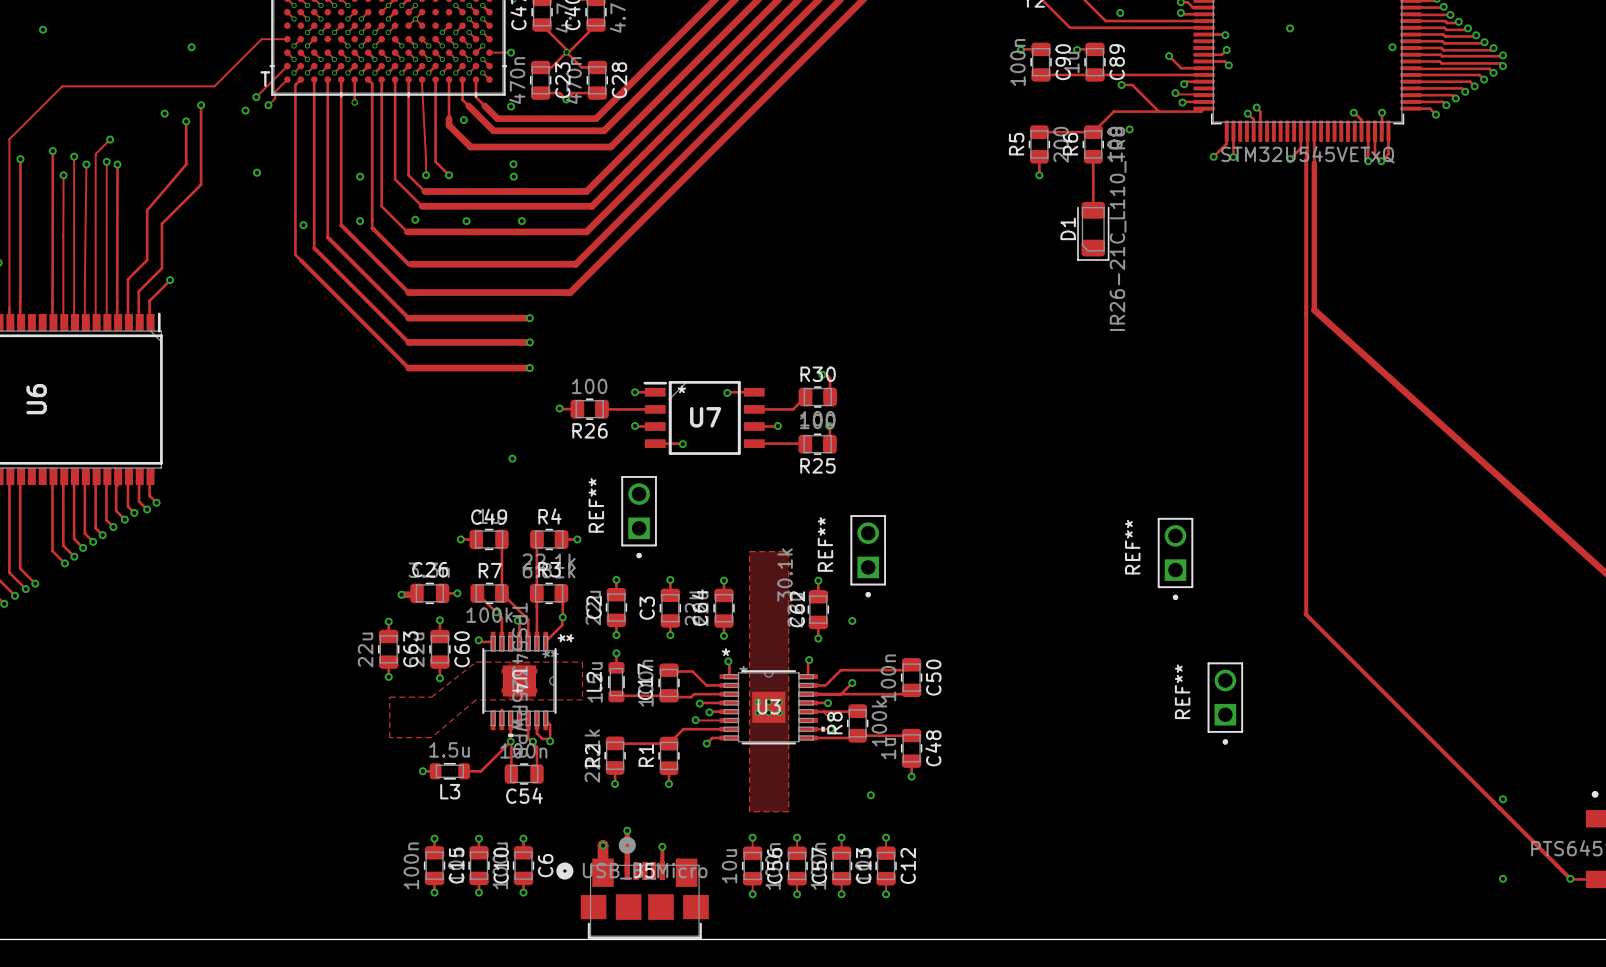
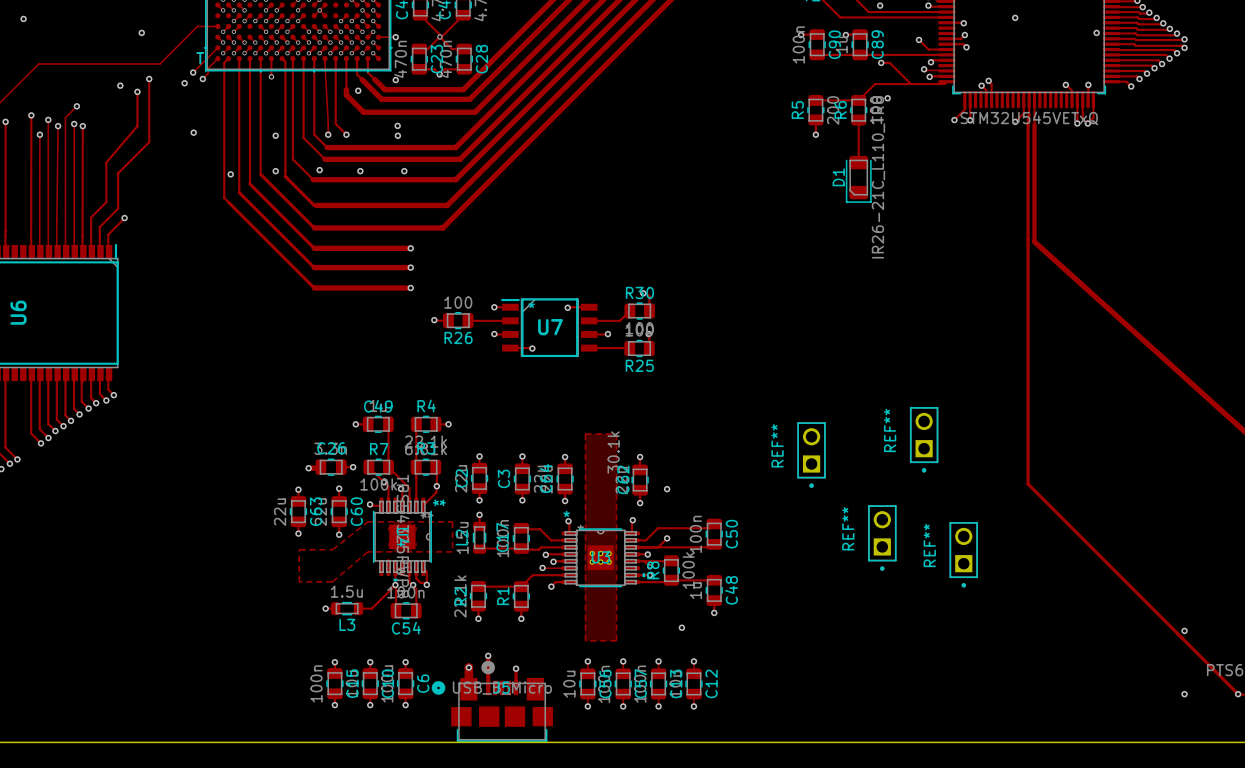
via: (512, 458) -> none
REF**: (639, 517) -> none
REF**: (868, 556) -> none
REF**: none -> (811, 455)
REF**: none -> (882, 538)

